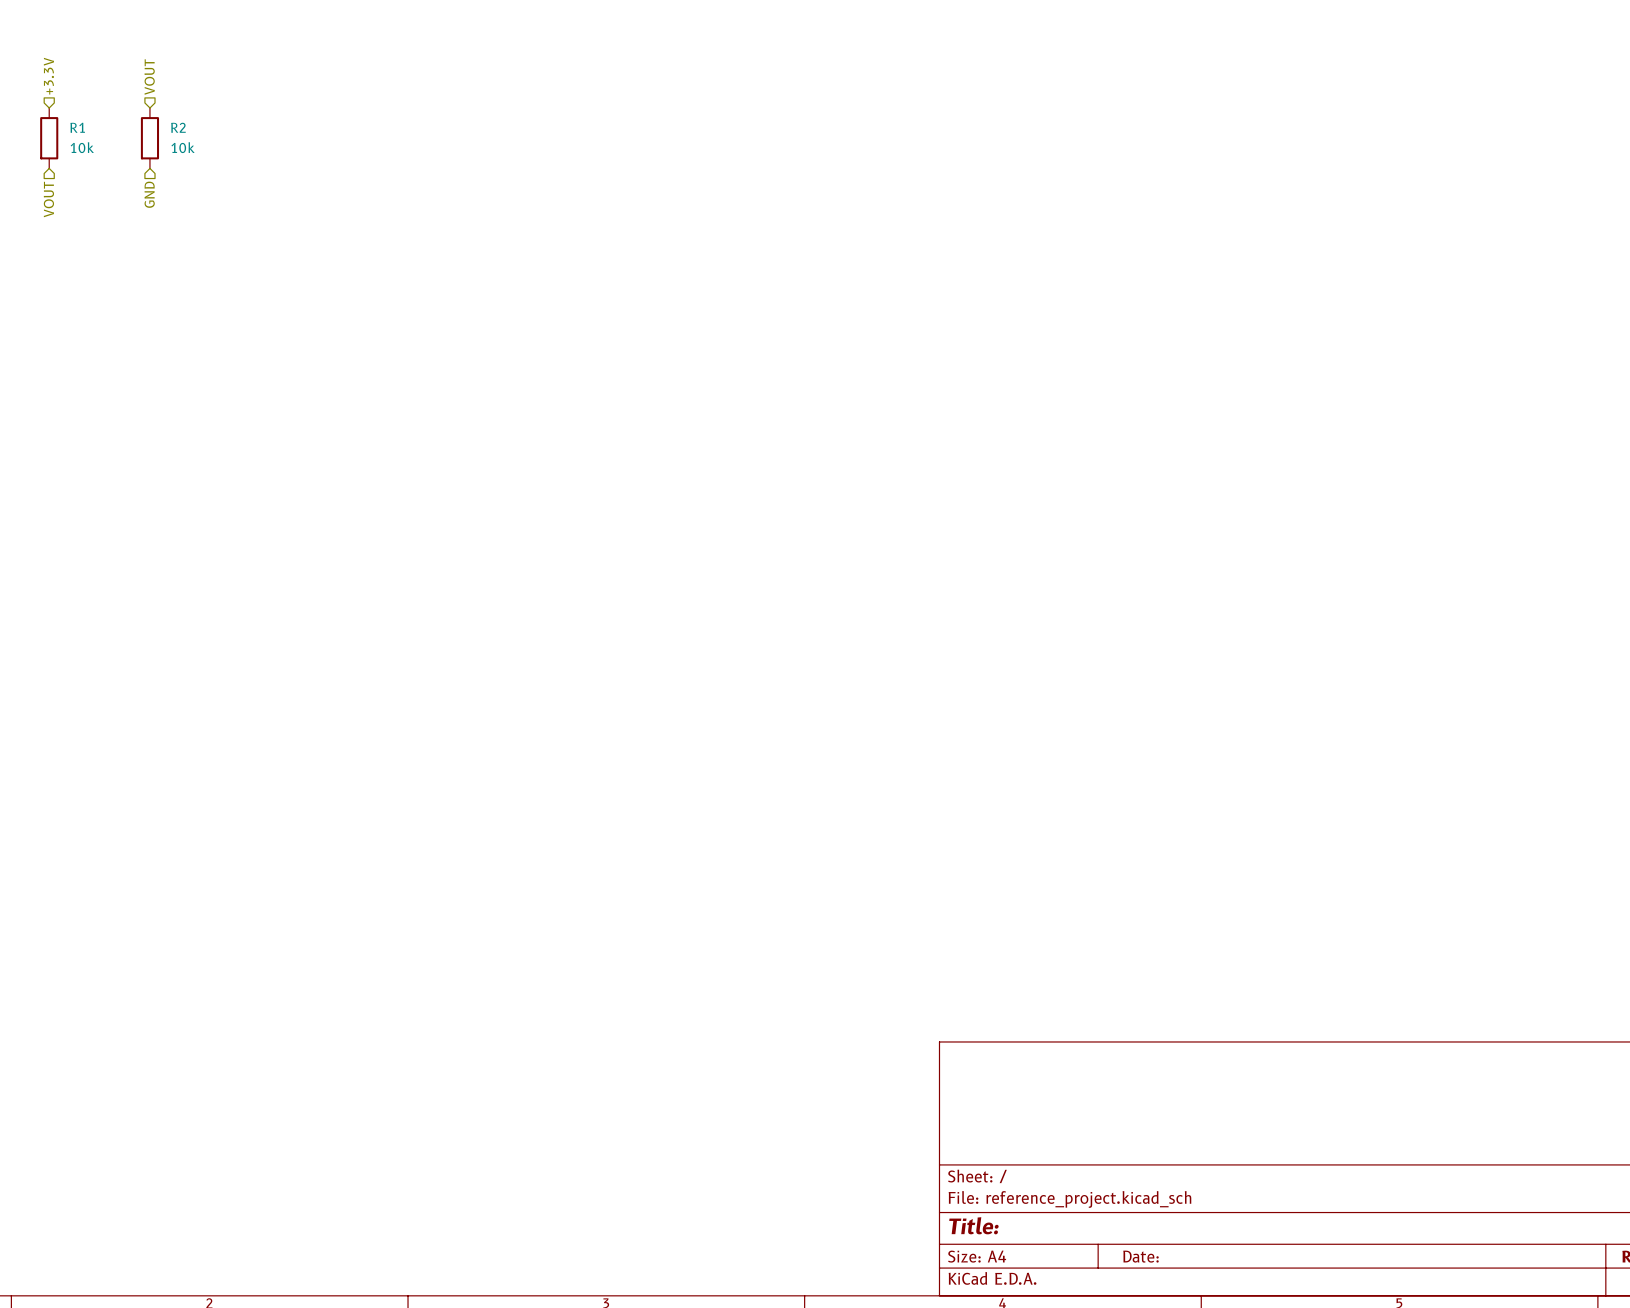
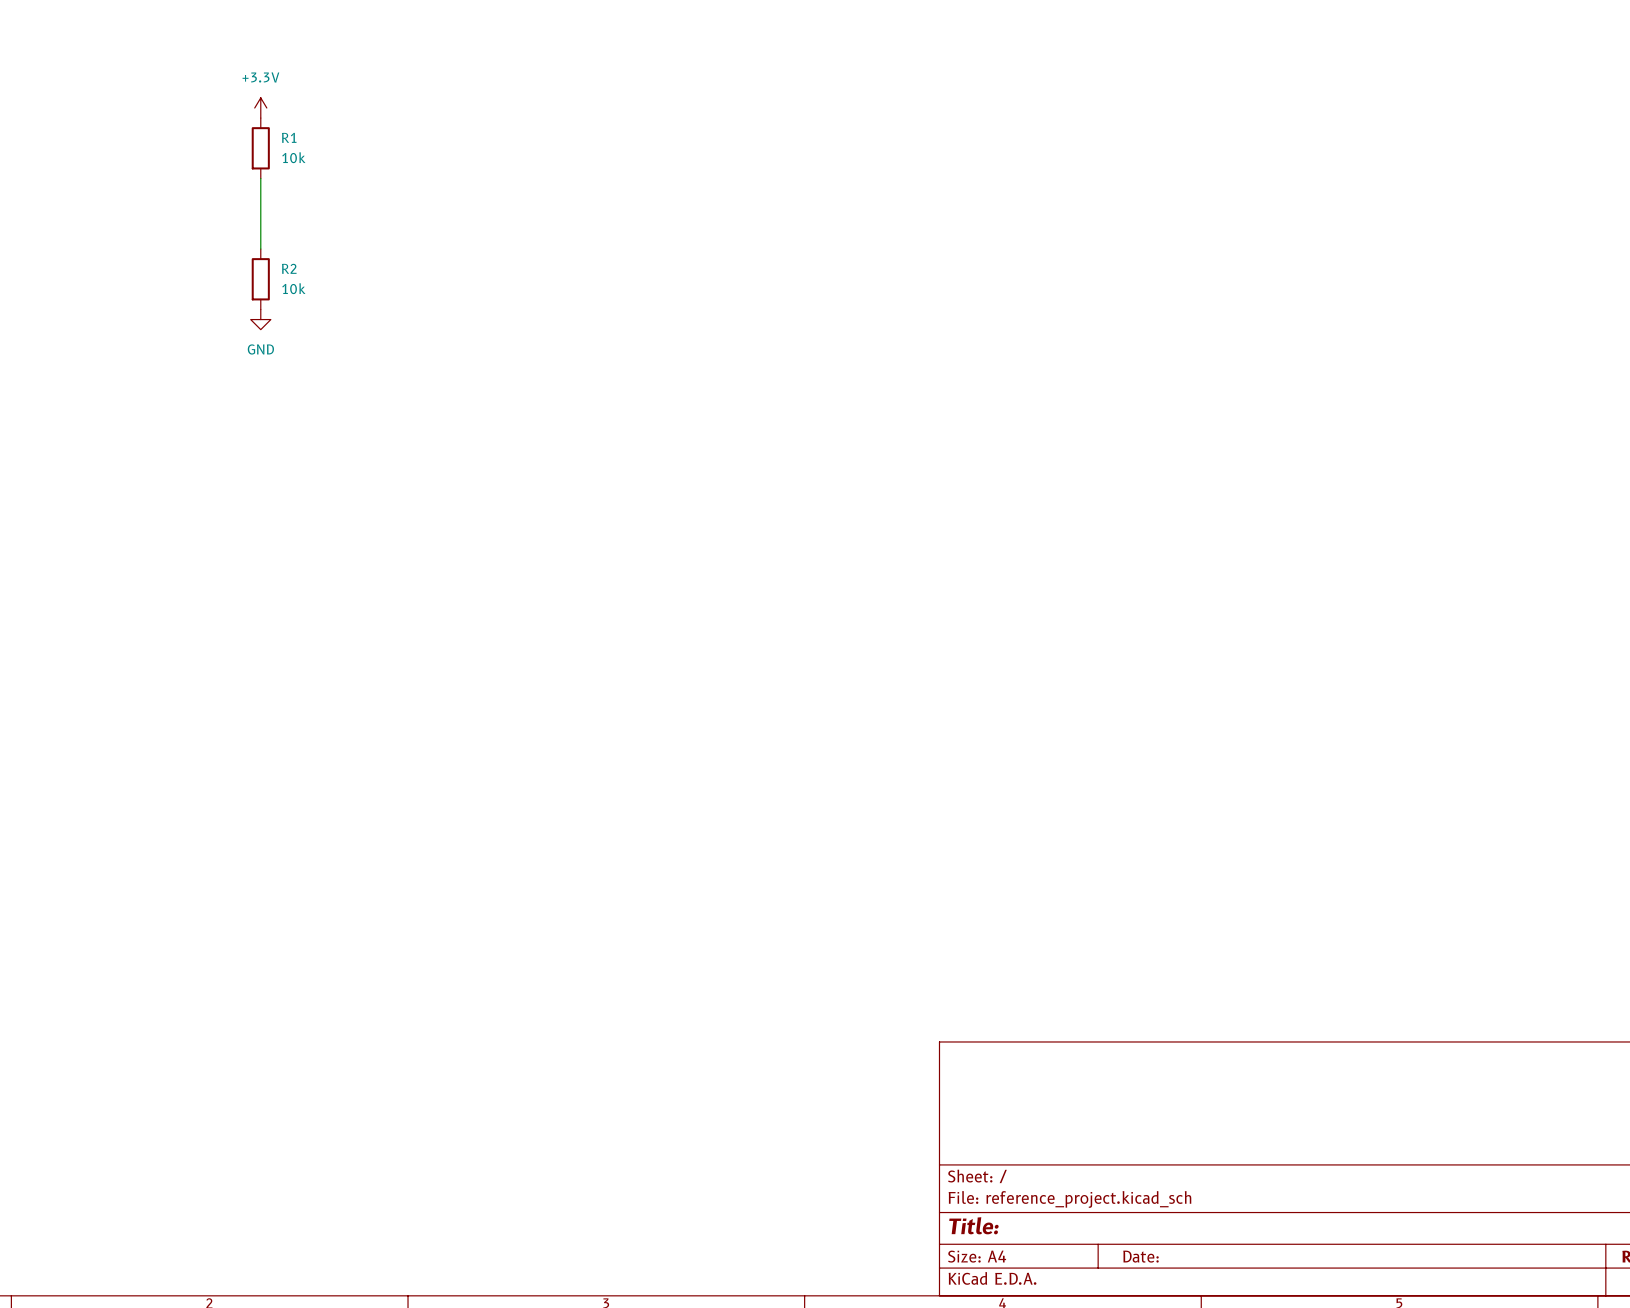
hierarchical label: +3.3V (48, 76) -> none
hierarchical label: VOUT (149, 77) -> none
power symbol: none -> +3.3V (260, 108)
R1 position: (49, 138) -> (260, 148)
R2 position: (149, 138) -> (260, 279)
wire: none -> (260, 178) (260, 249)
hierarchical label: GND (149, 194) -> none
hierarchical label: VOUT (48, 199) -> none
power symbol: none -> GND (260, 319)

